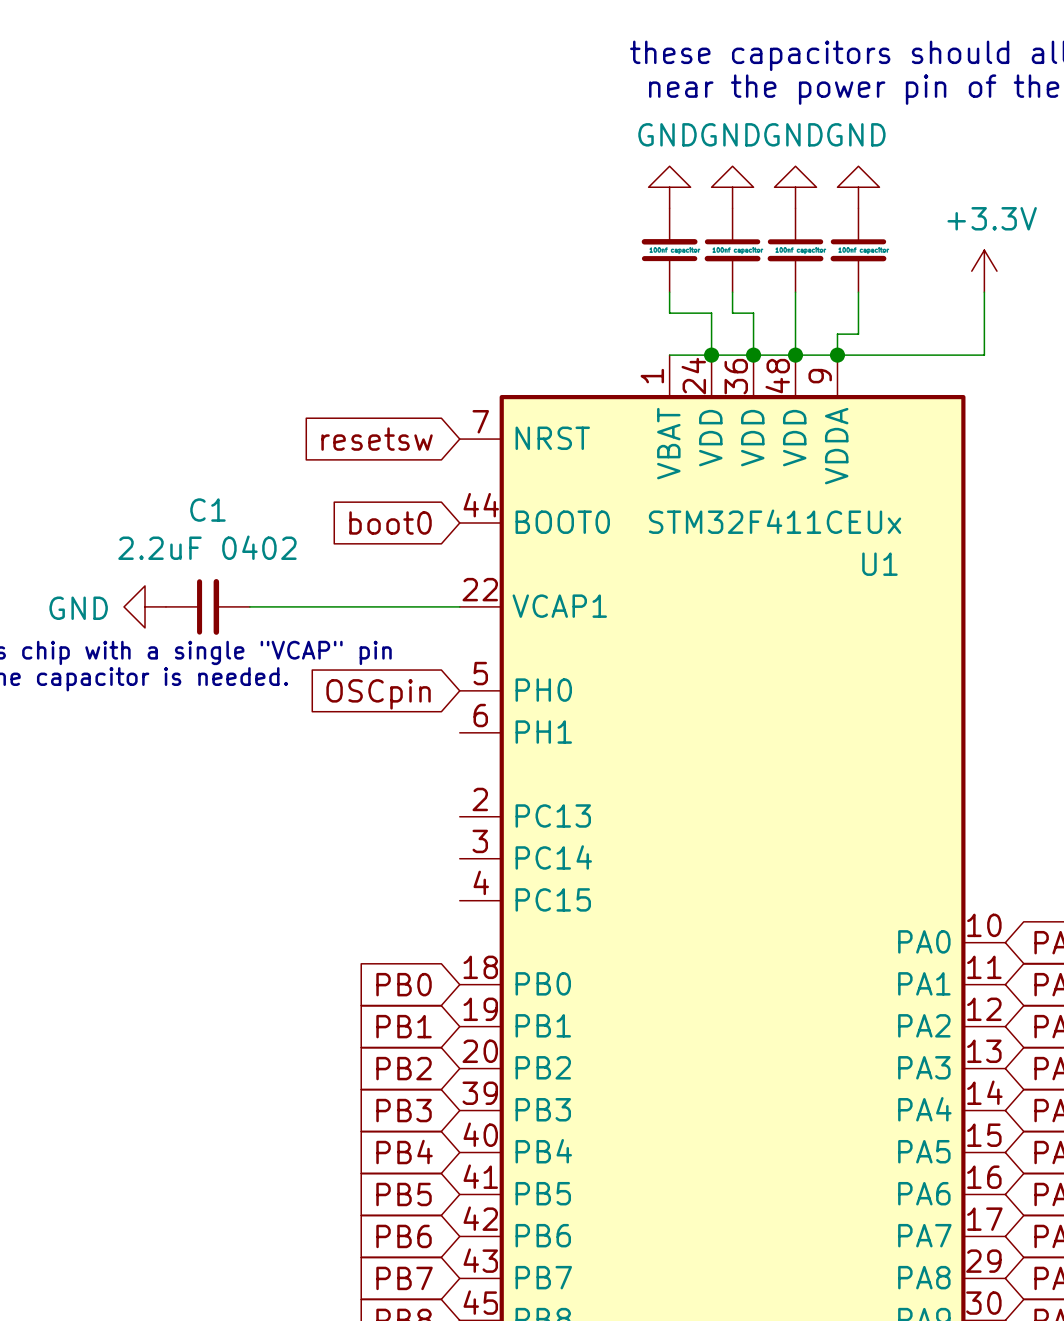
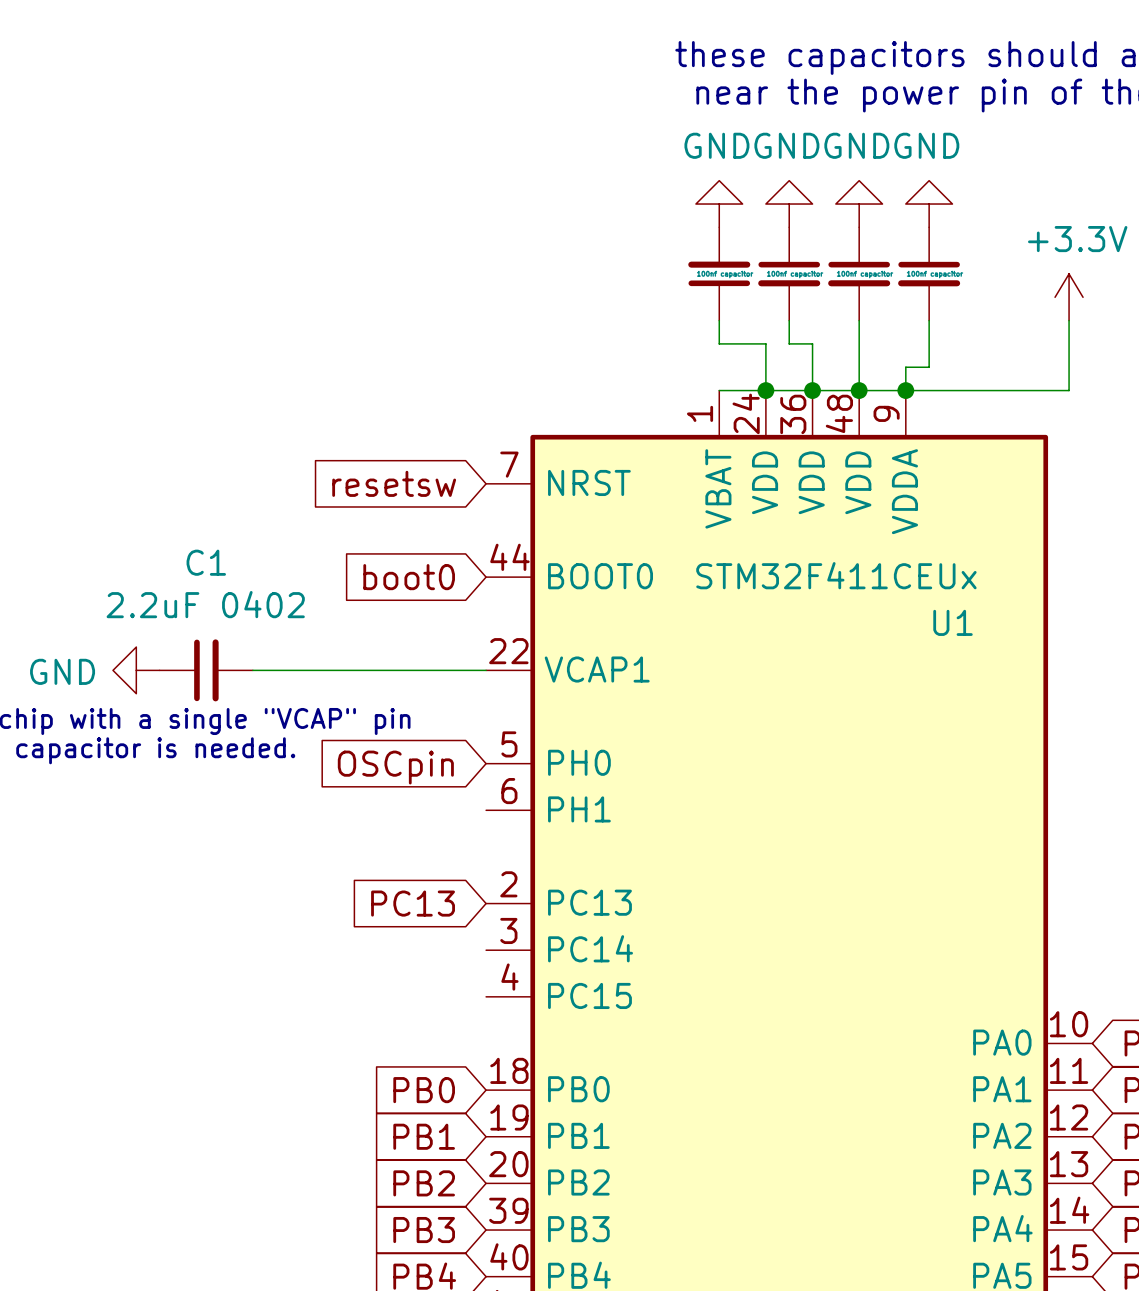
global label: none -> PC13 (413, 903)

